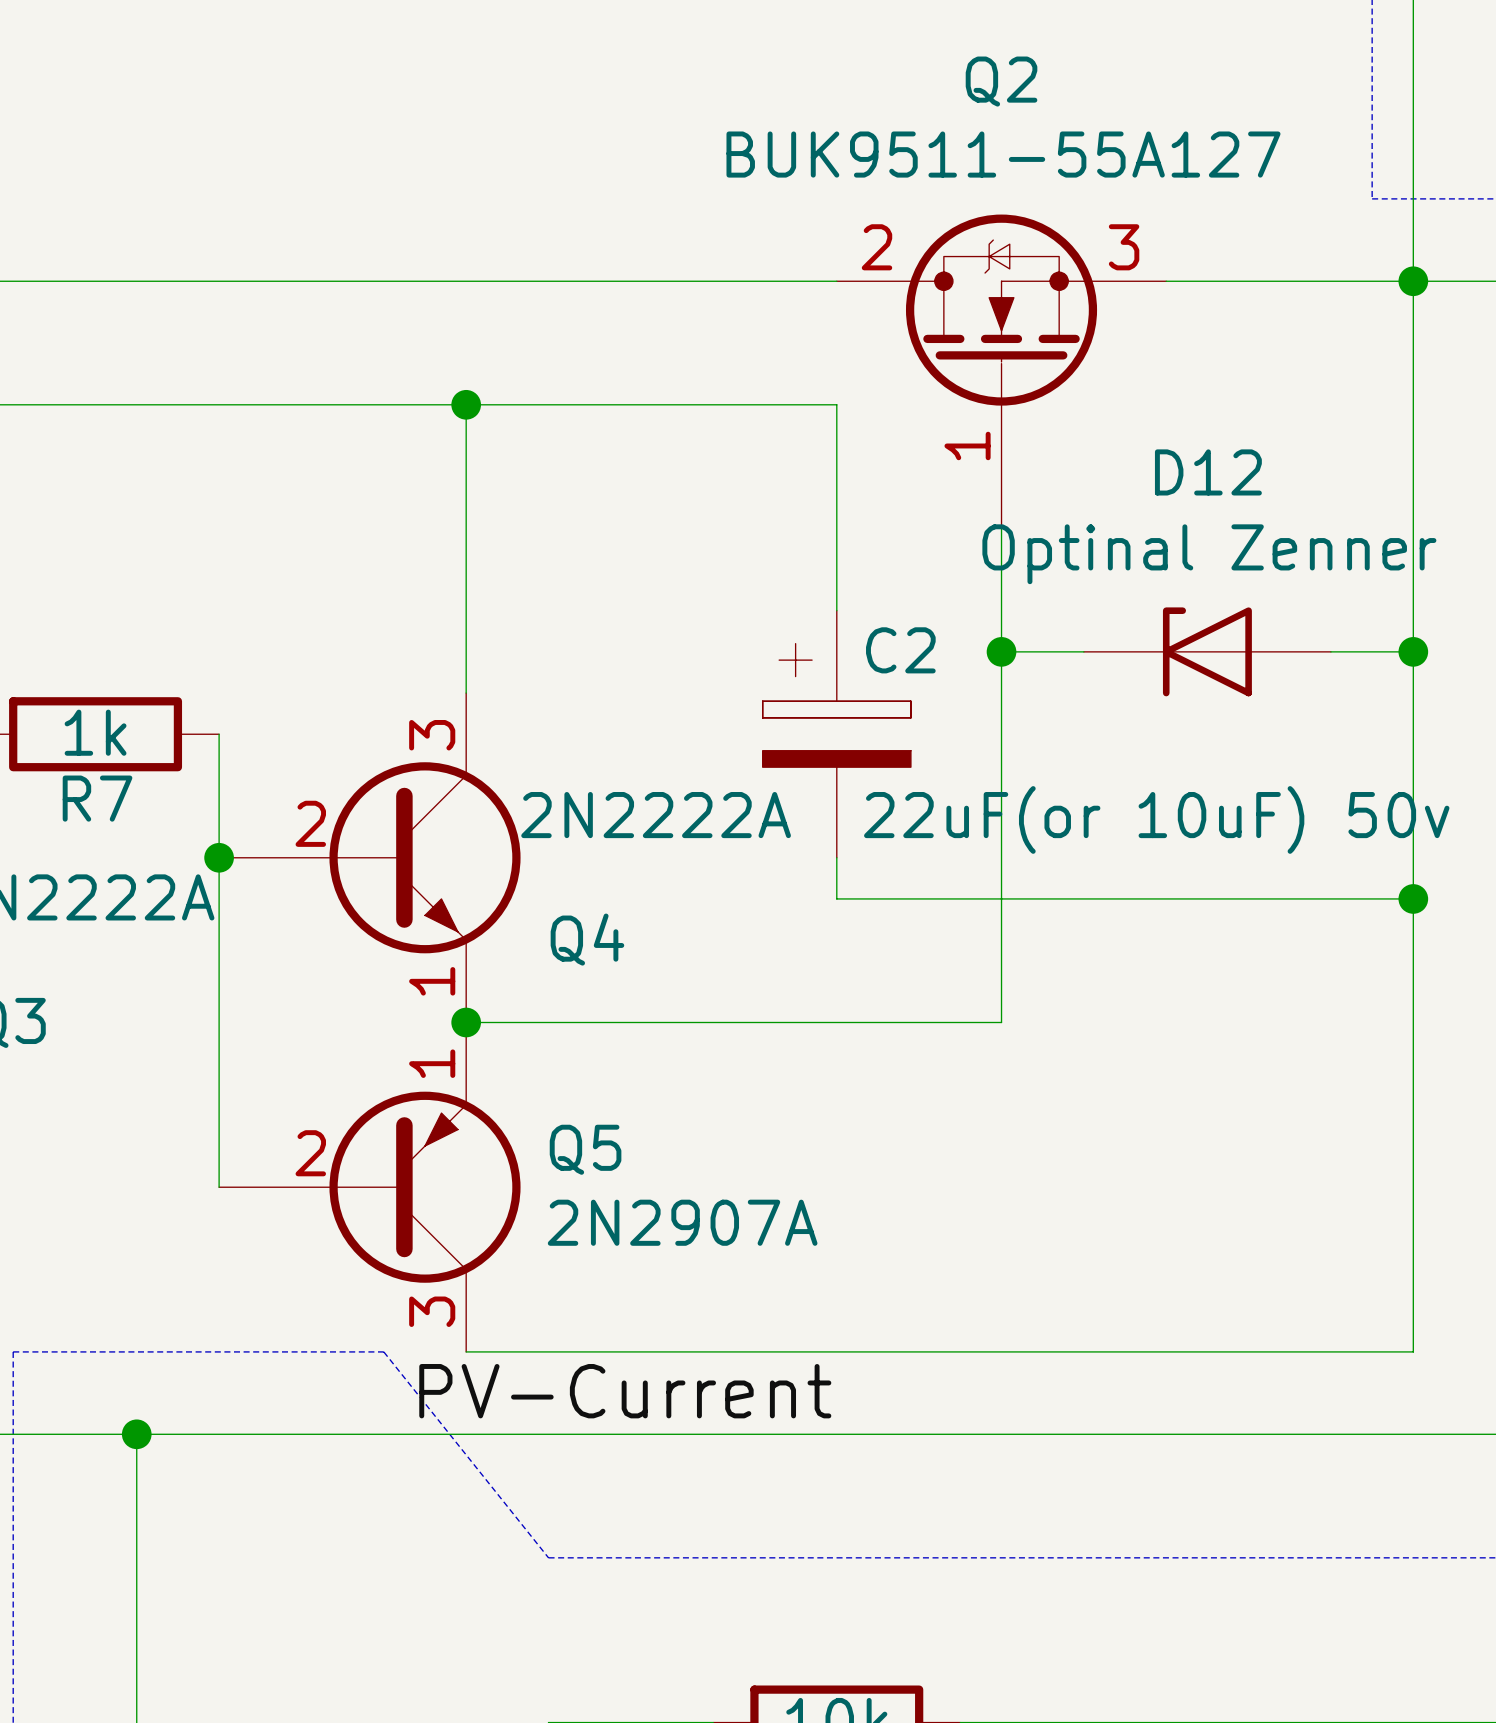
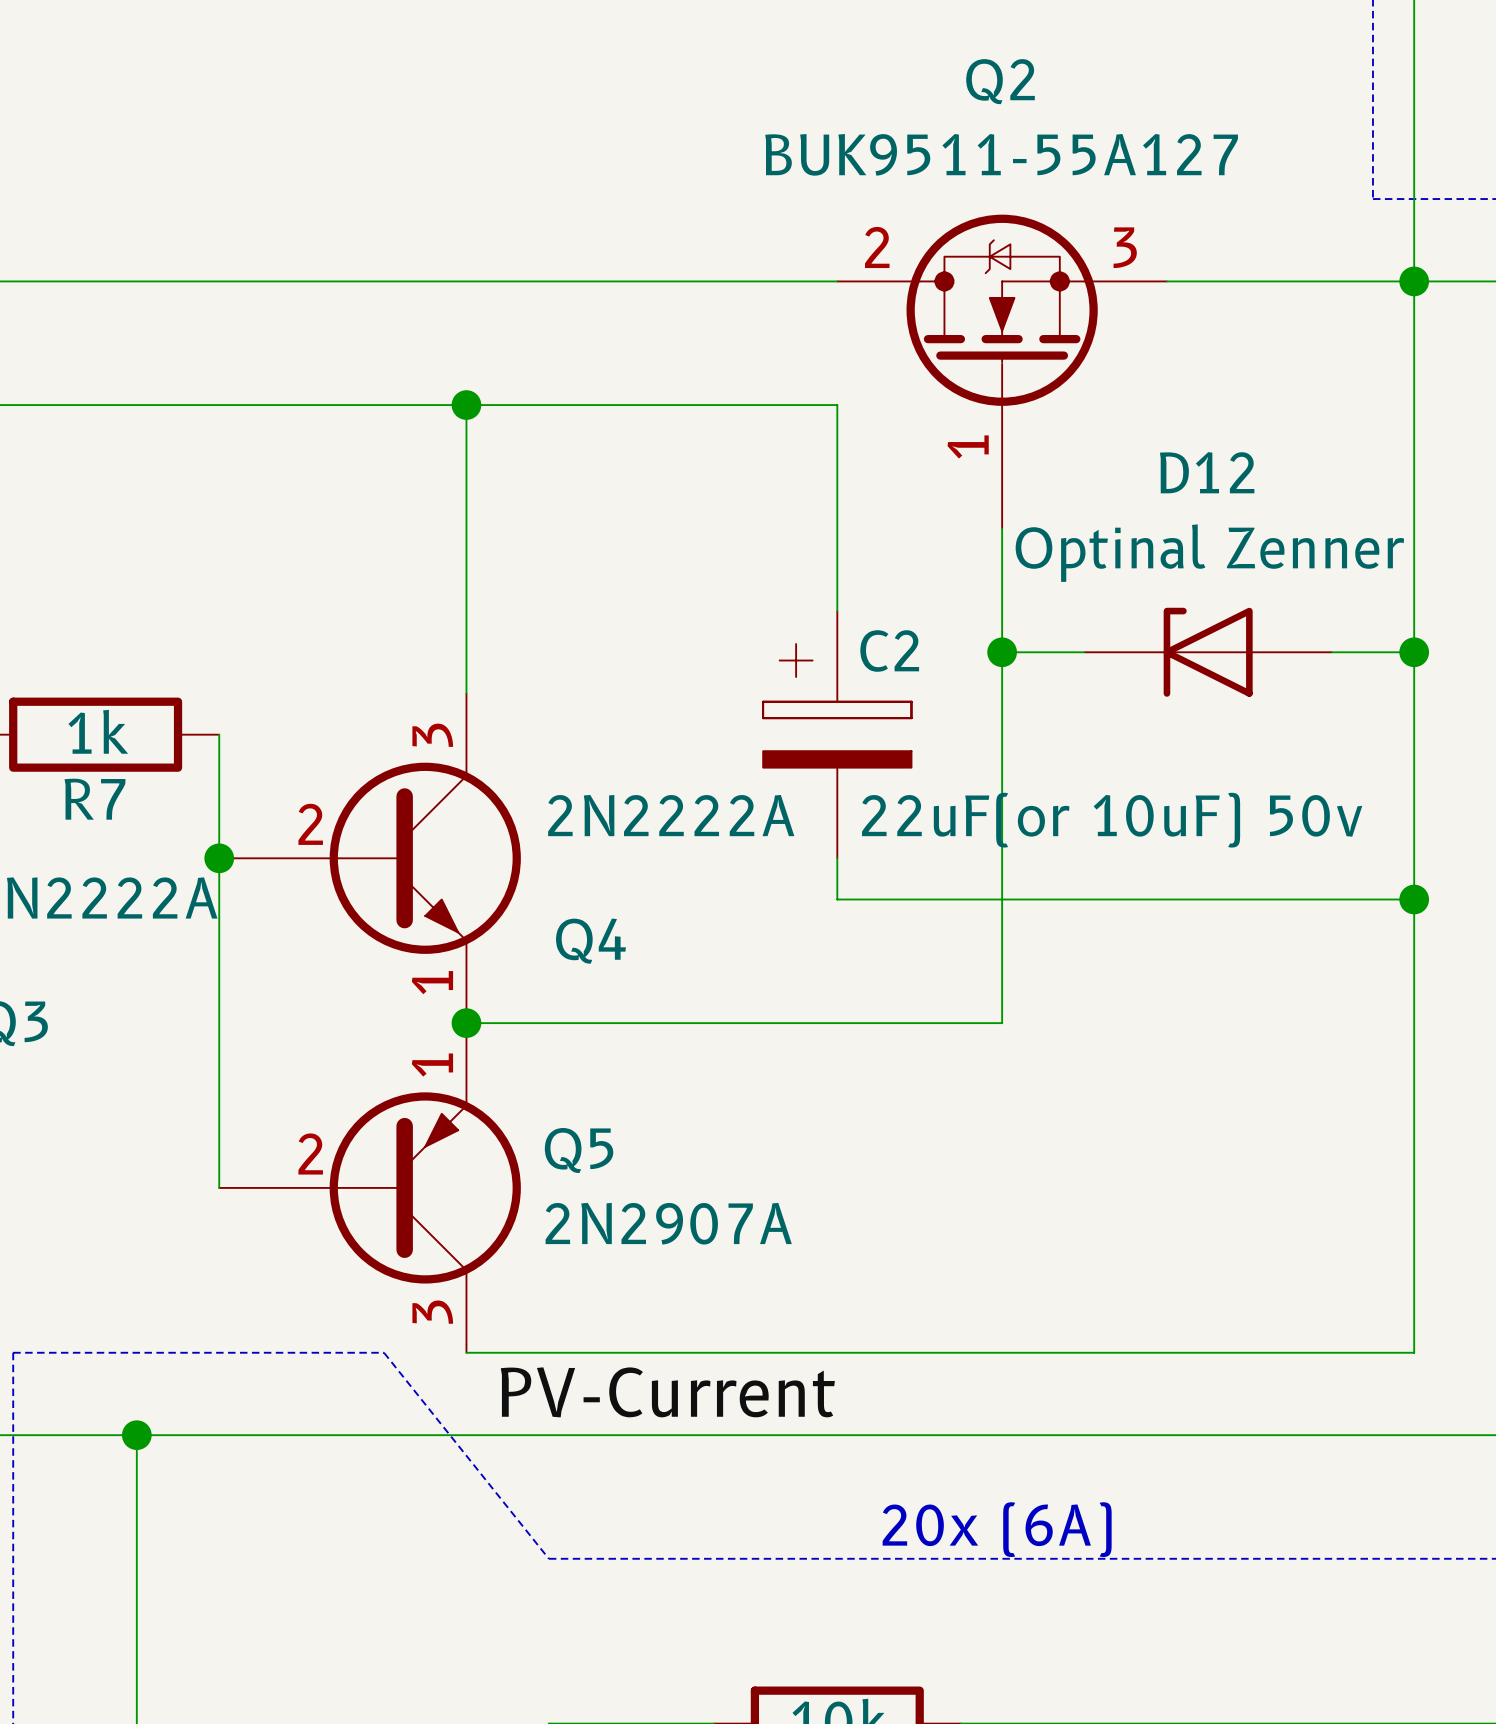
text: none -> 20x (6A) (997, 1529)

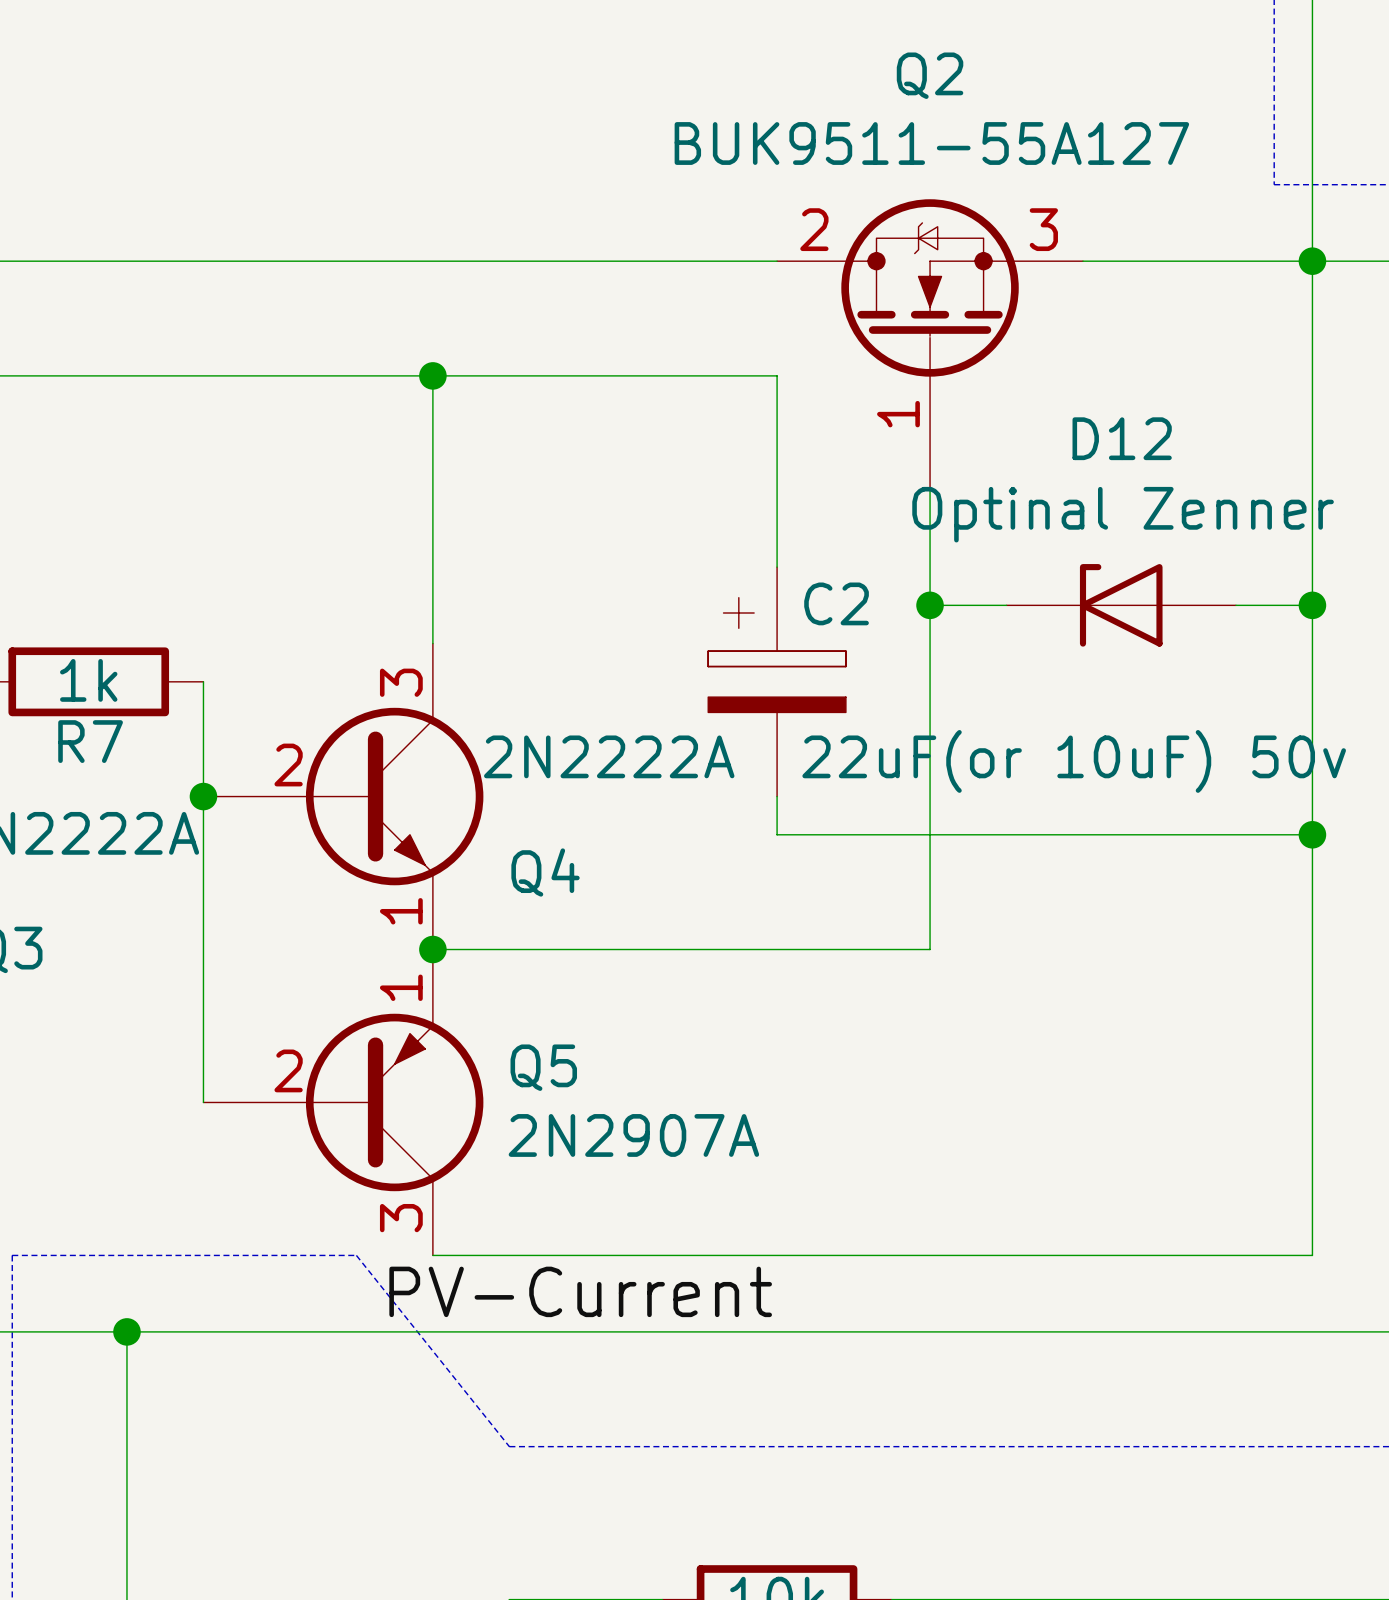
text: 20x (6A) (997, 1529) -> none

